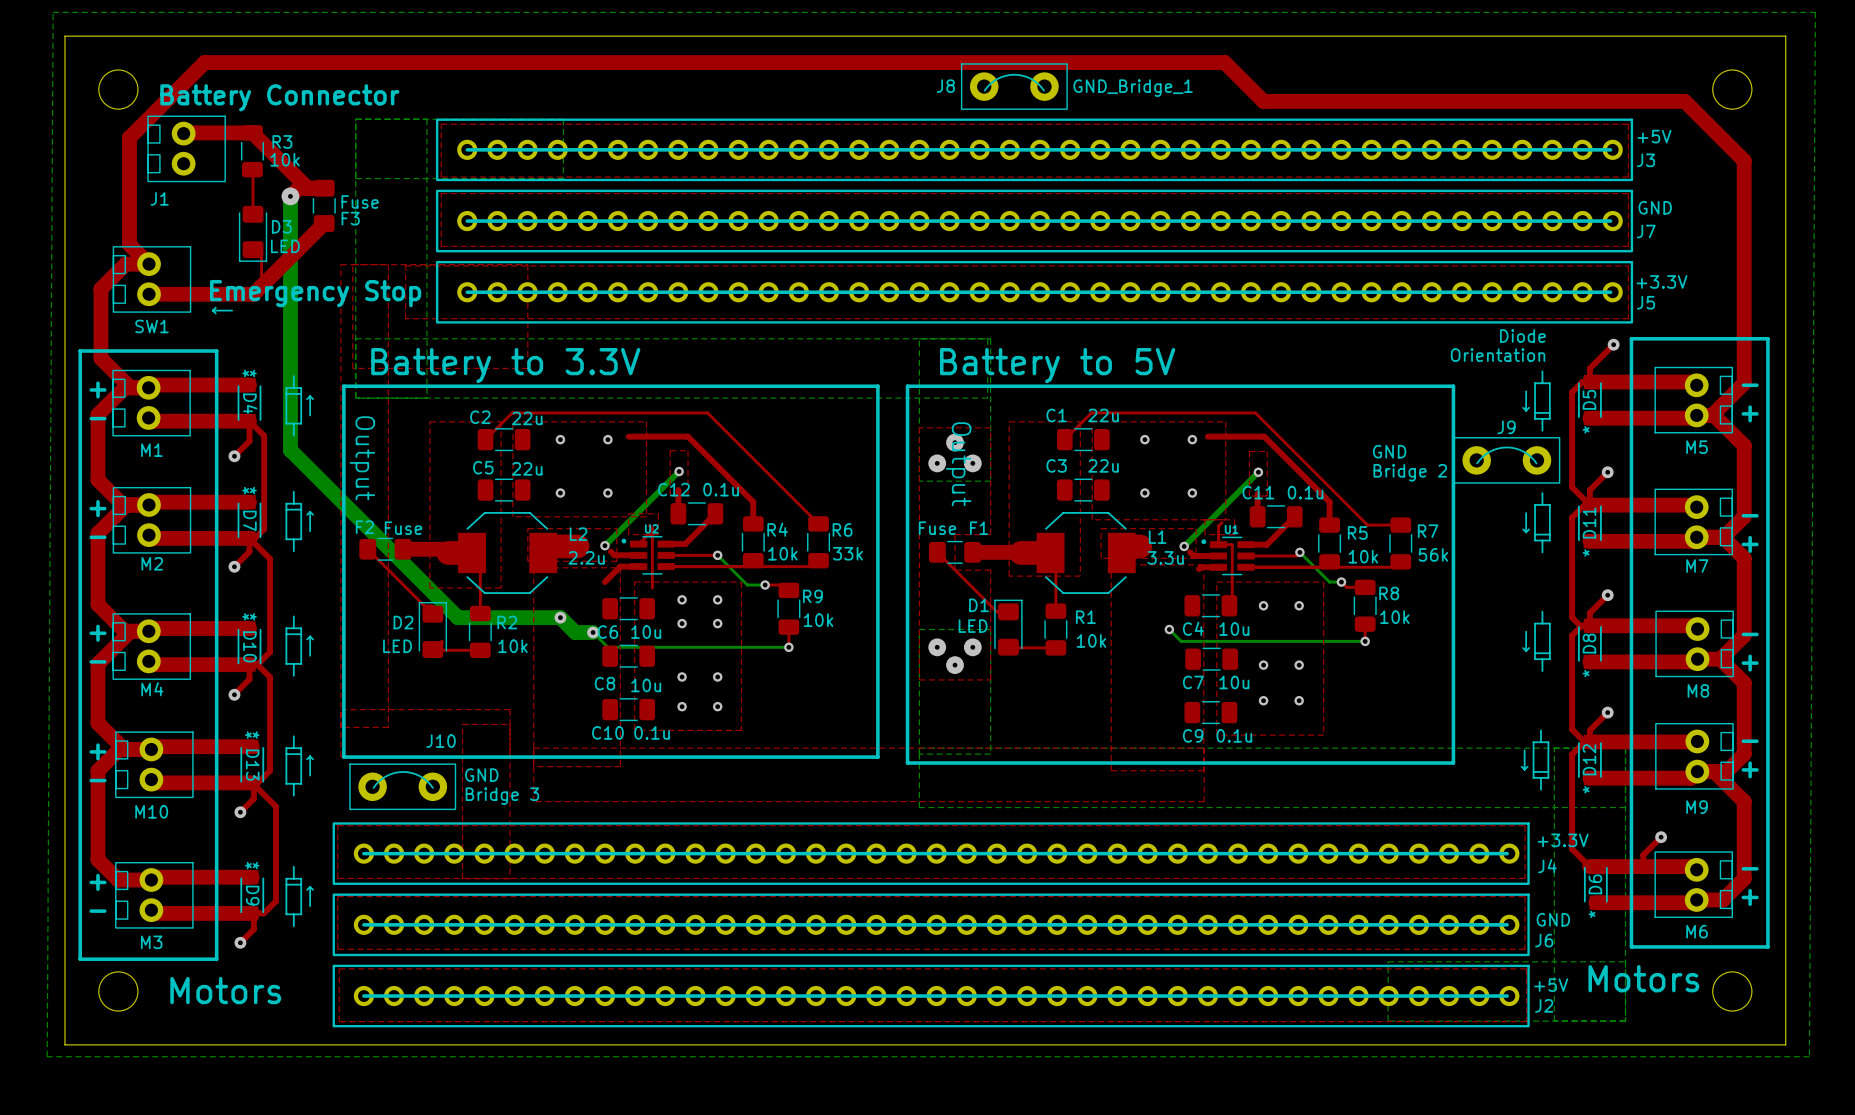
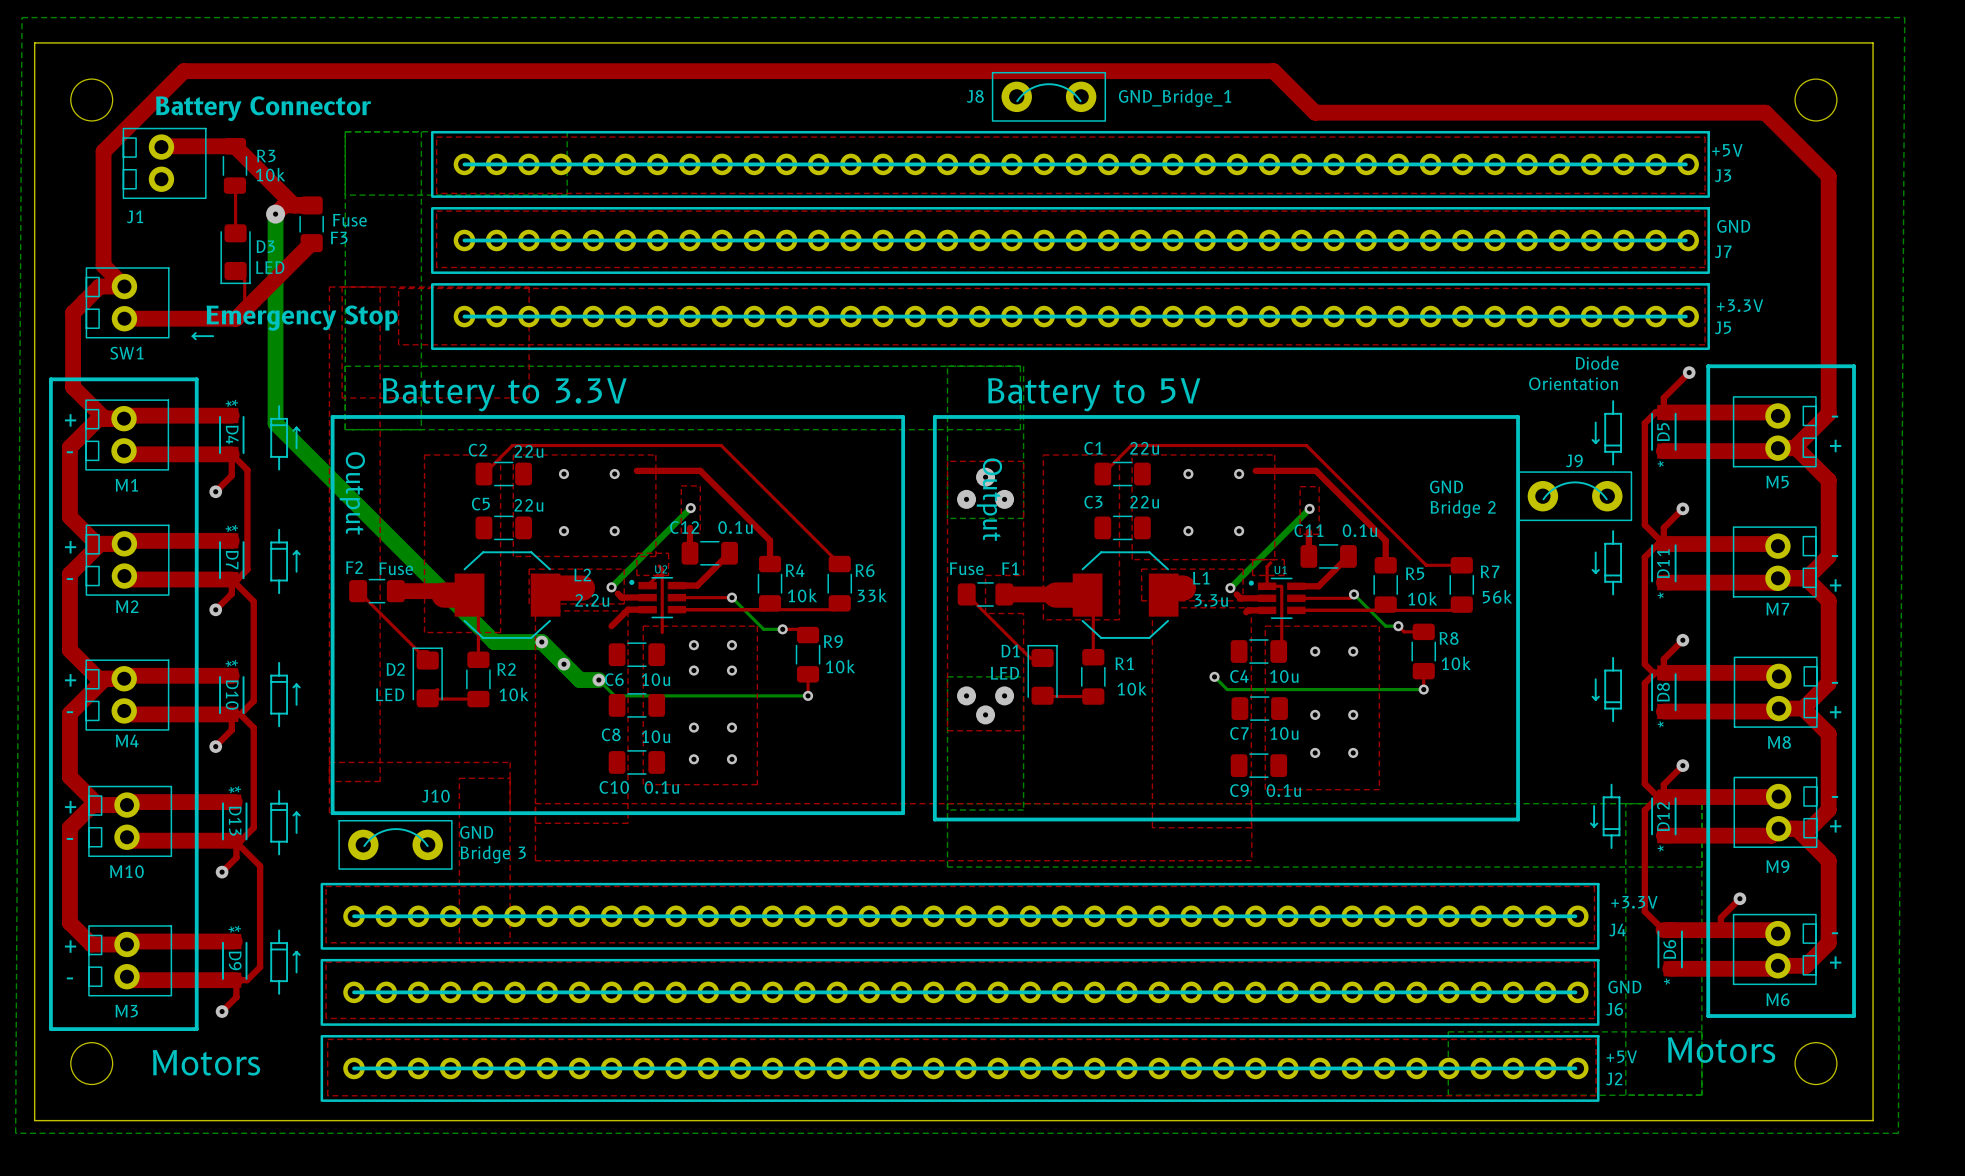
bottom track: (290, 392) (290, 450) (457, 617) (560, 617) -> (275, 423) (494, 642) (541, 642) (563, 664)
via: none -> (541, 642)

